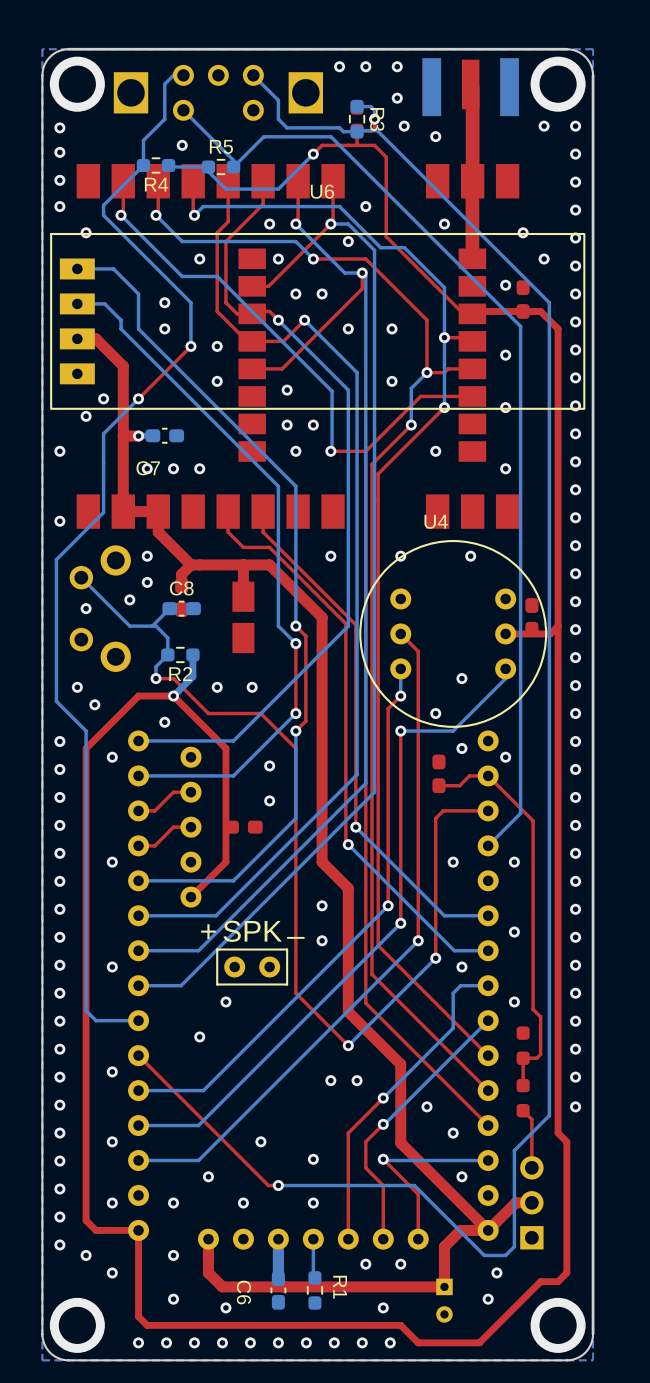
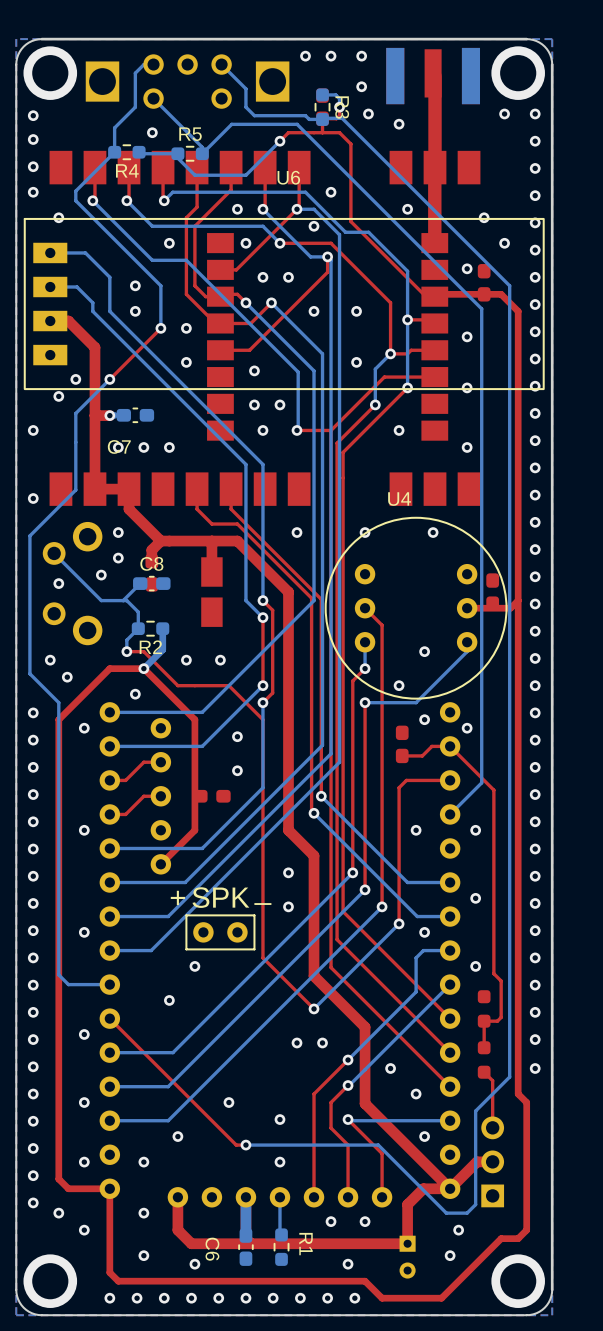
via: (243, 1203) -> none

